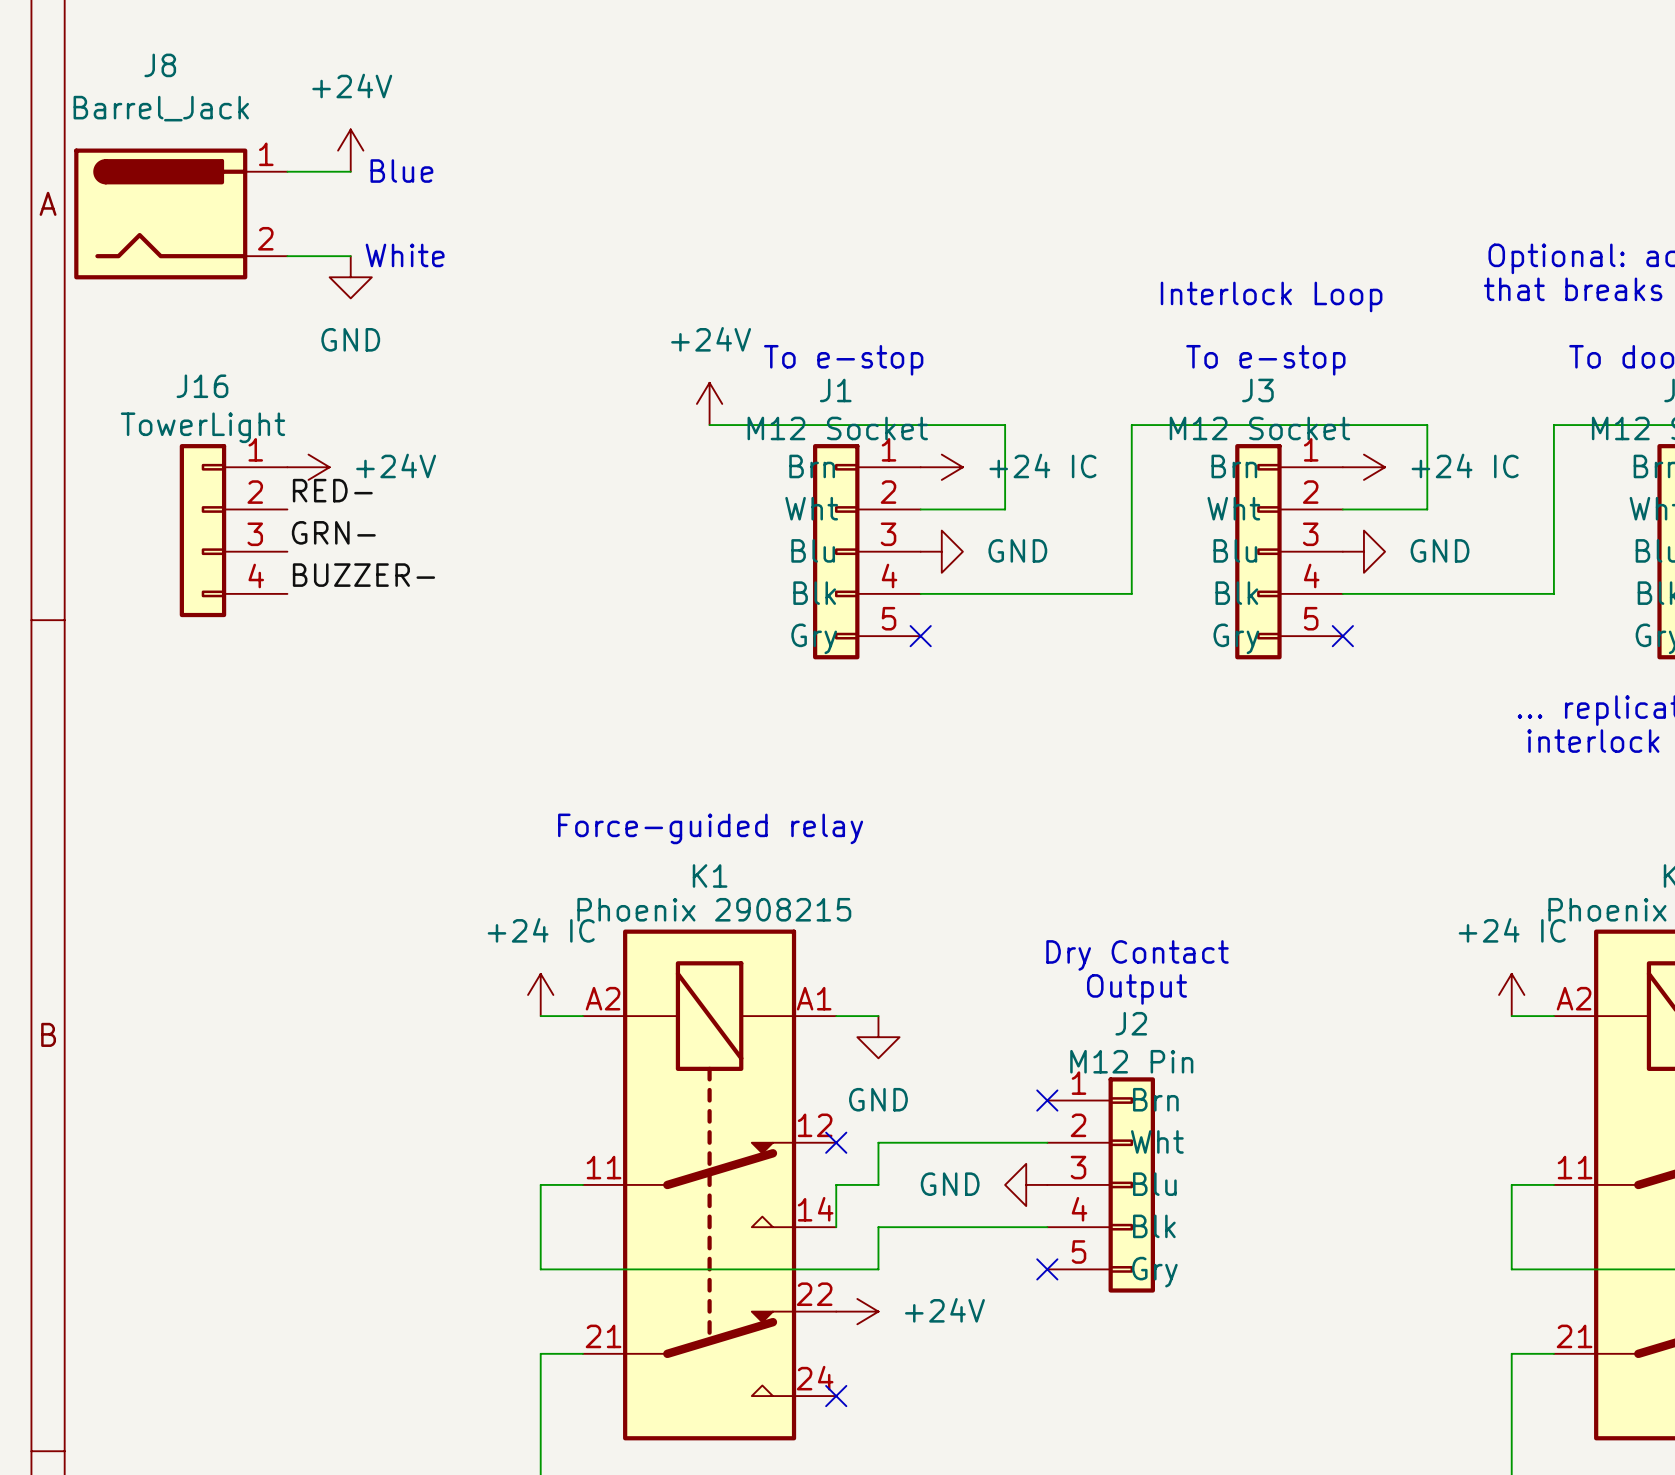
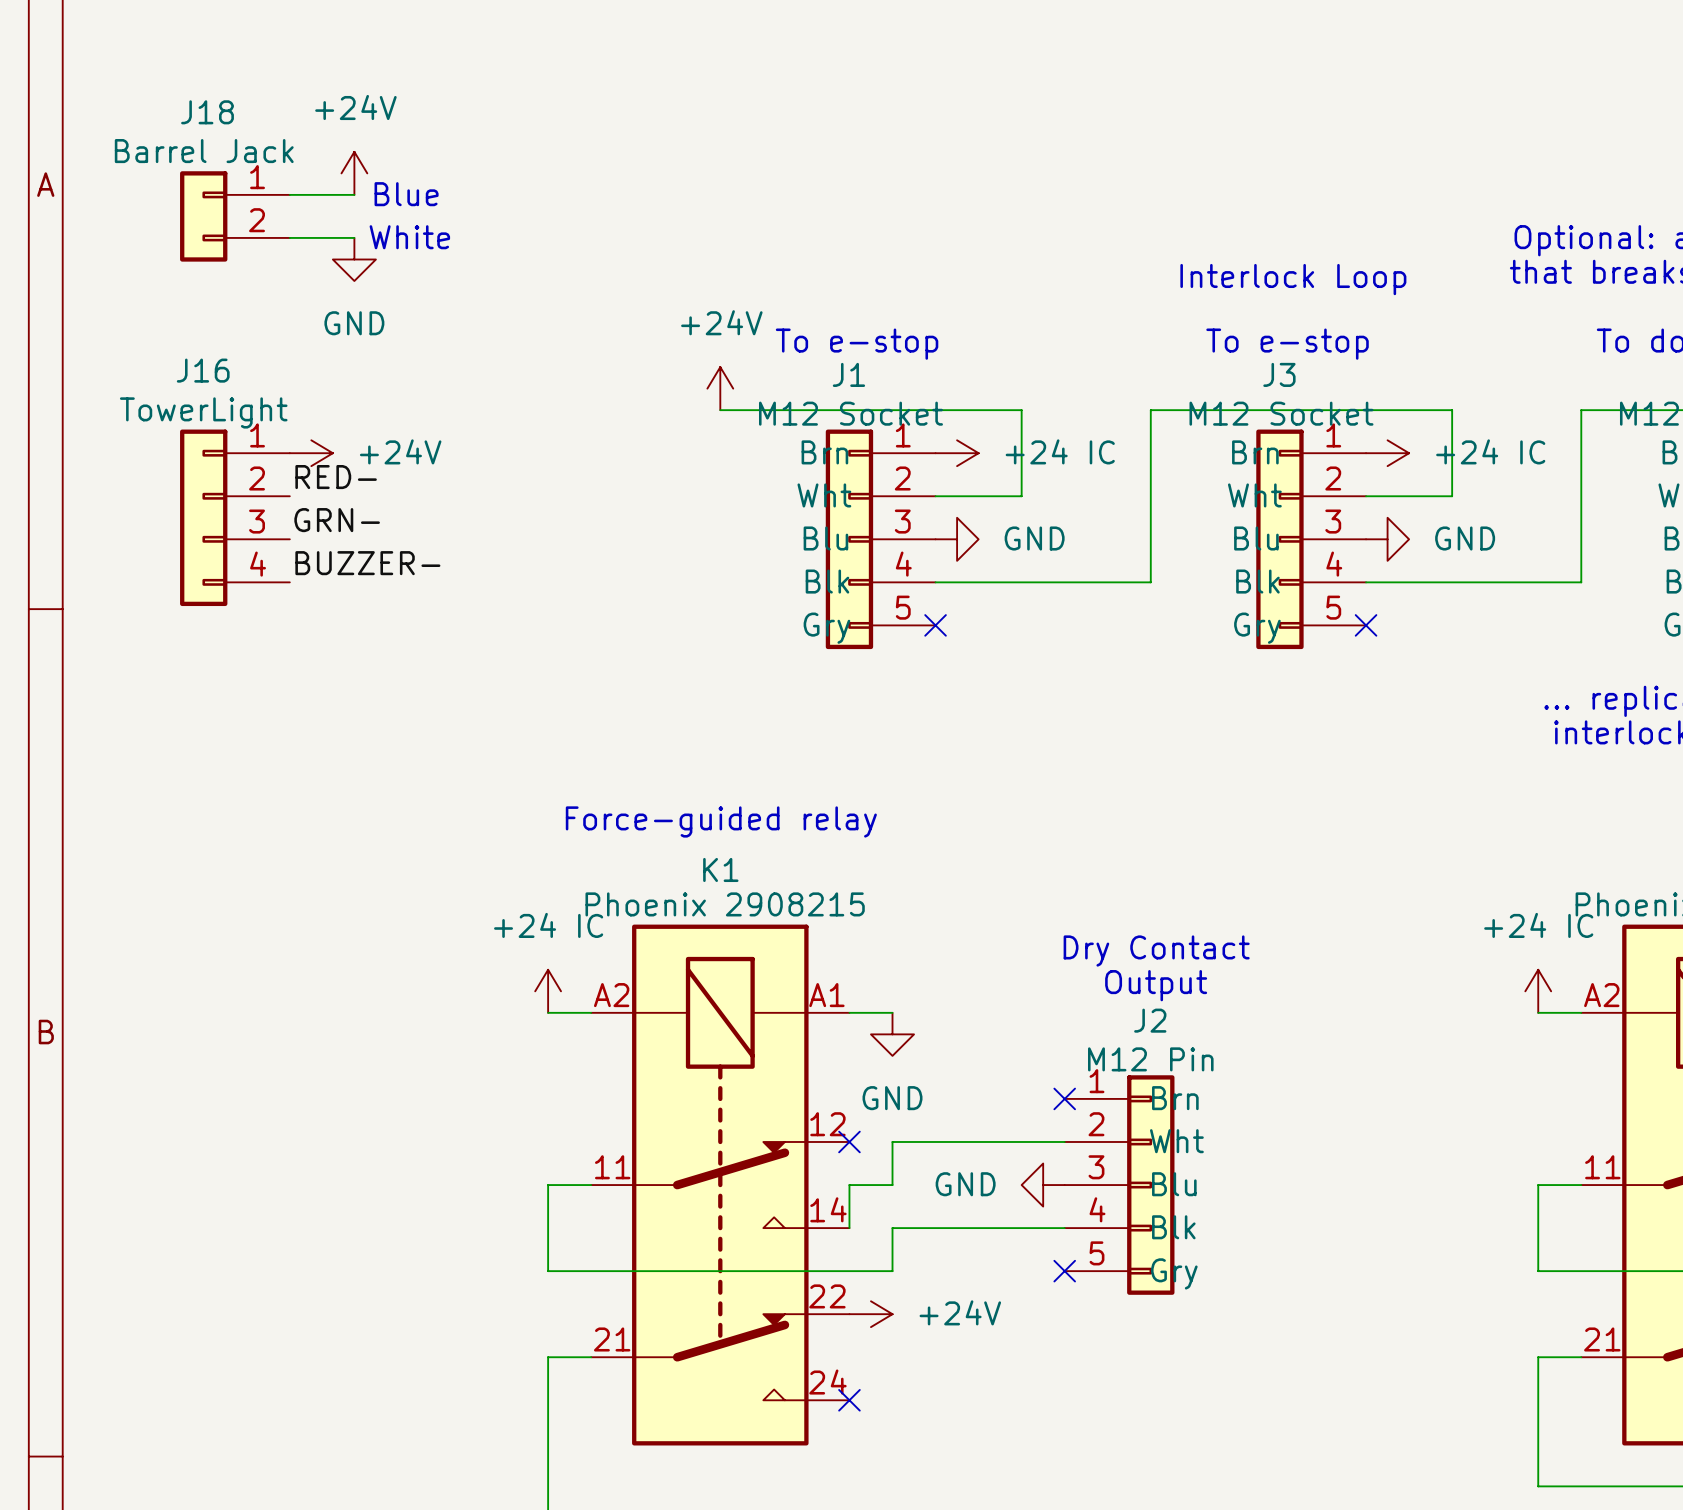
power symbol position: +24V (350, 150) -> +24V (354, 173)
wire: (287, 171) (350, 171) -> (289, 194) (354, 194)
text position: Blue (401, 171) -> Blue (406, 194)
J8: Barrel_Jack (180, 213) -> none
J18: none -> Barrel Jack (234, 216)

